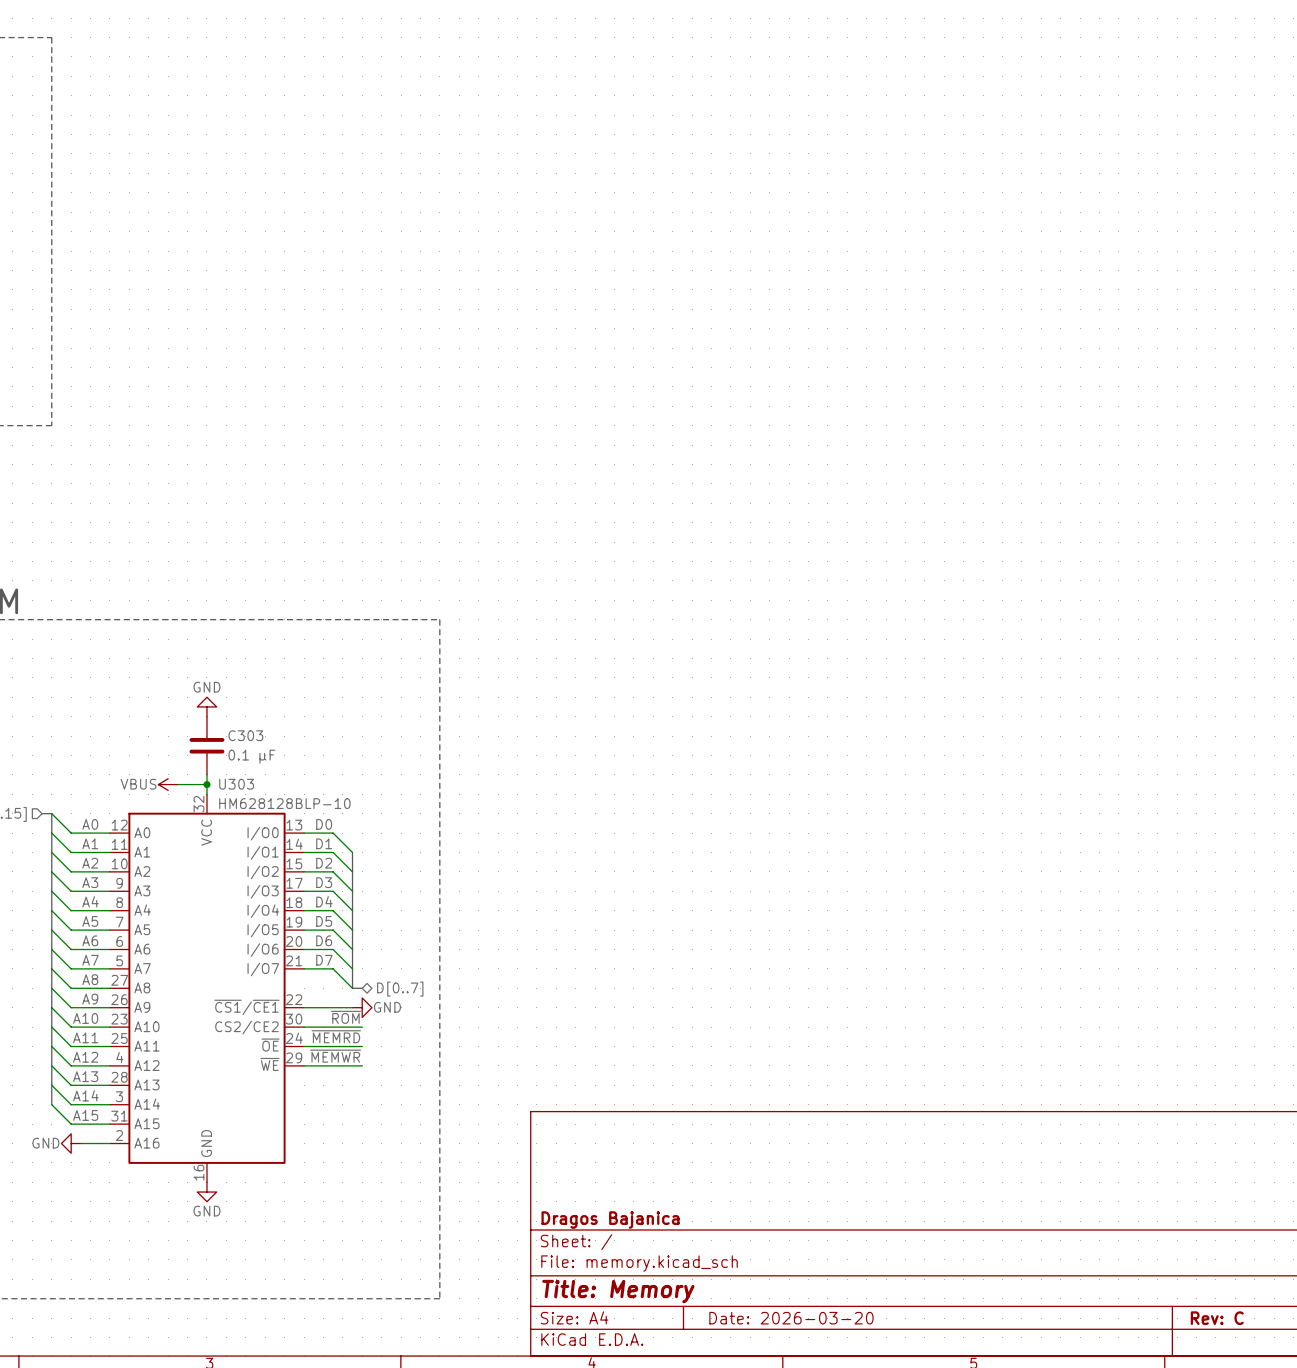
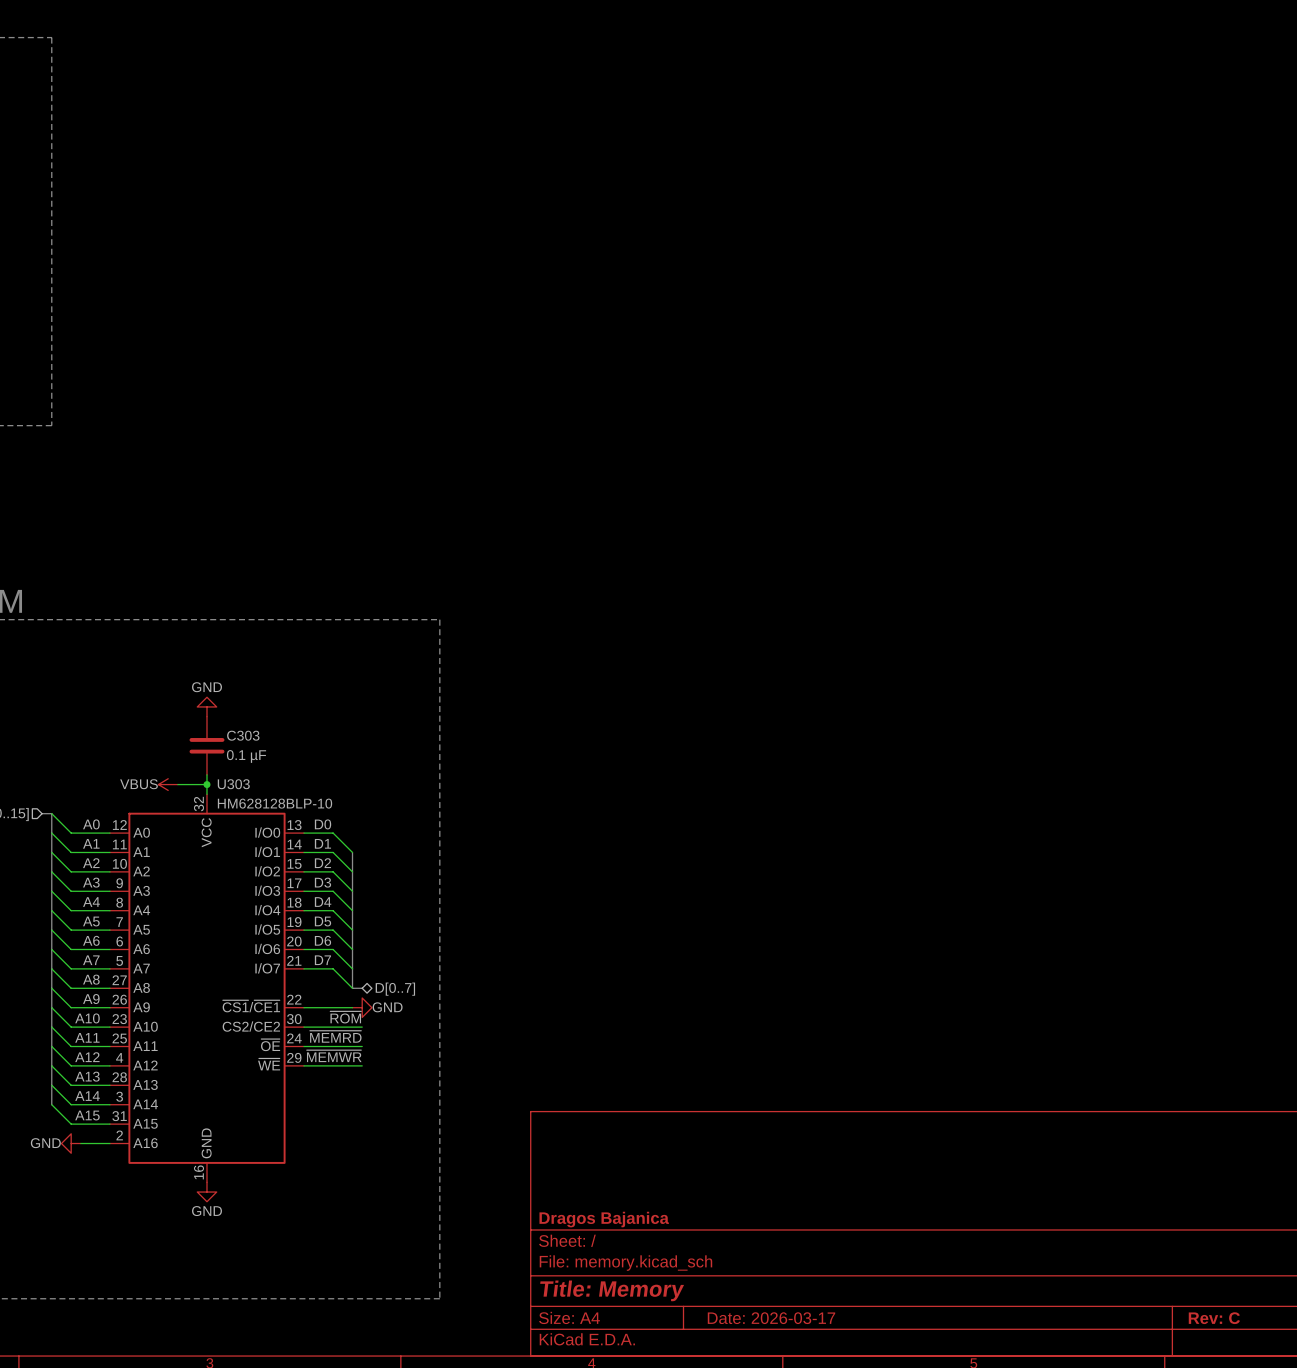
title block: Date: 2026-03-20 (791, 1318) -> Date: 2026-03-17 (771, 1318)

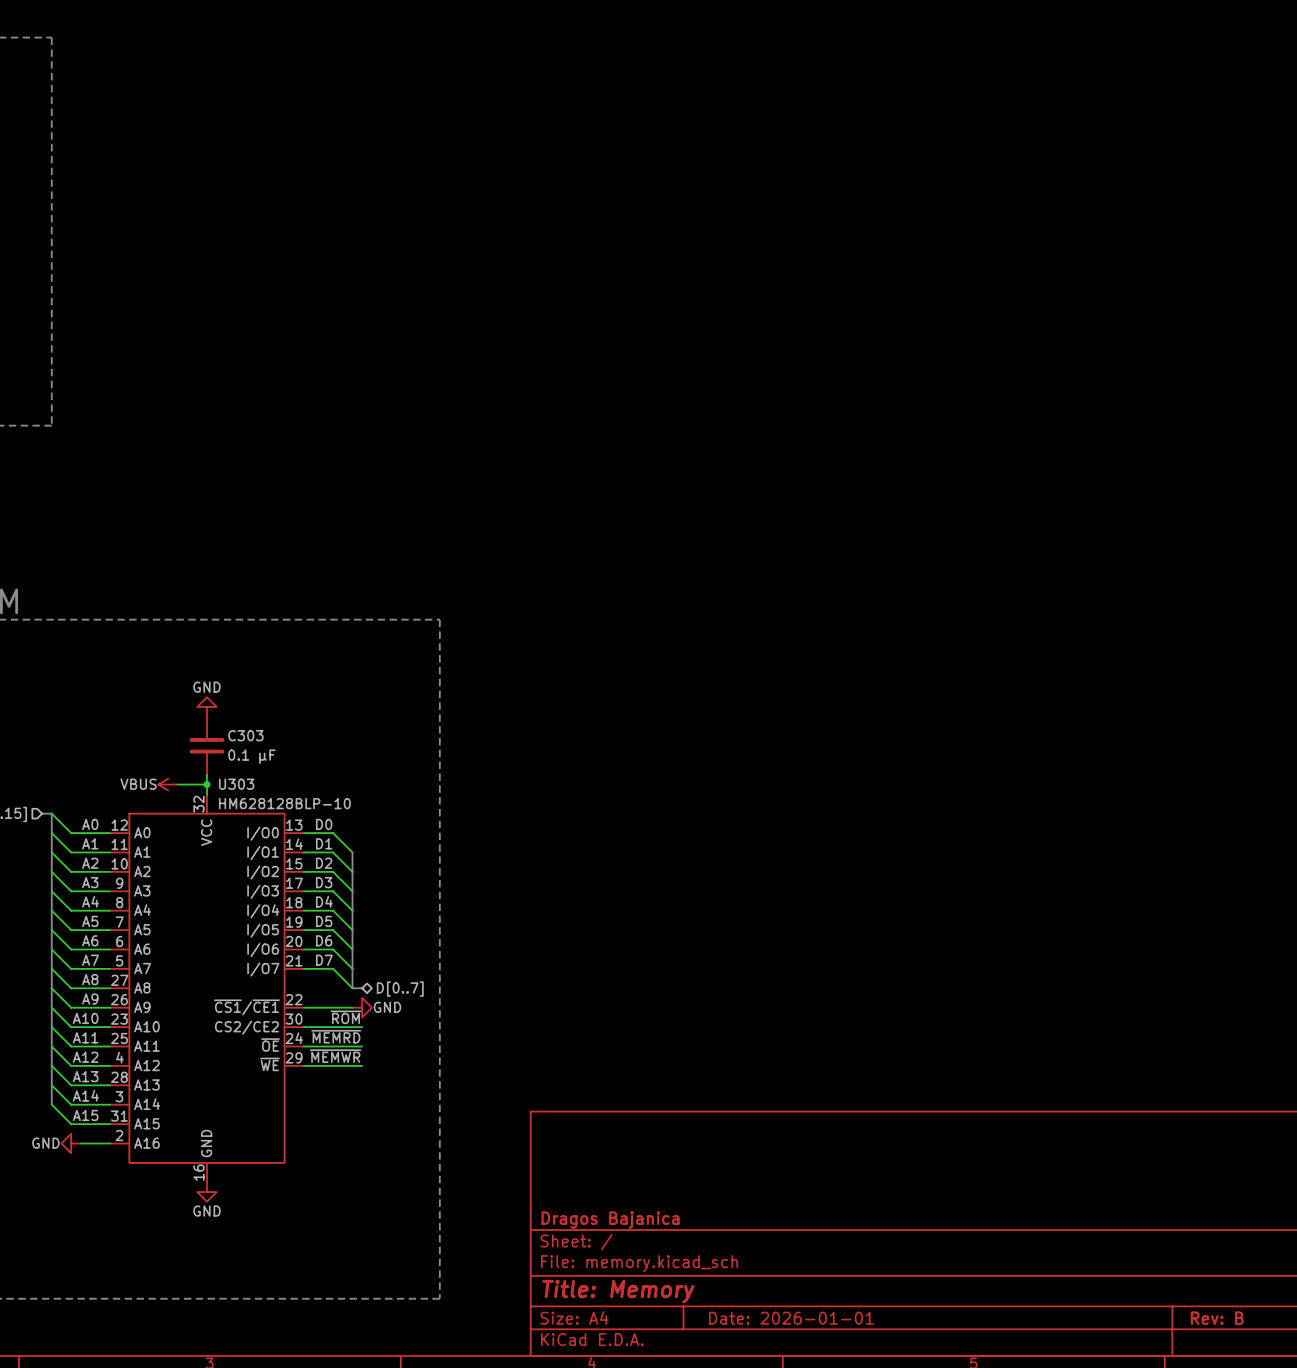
title block: Date: 2026-03-17 (771, 1318) -> Date: 2026-01-01 (791, 1318)
title block: Rev: C (1214, 1318) -> Rev: B (1217, 1318)

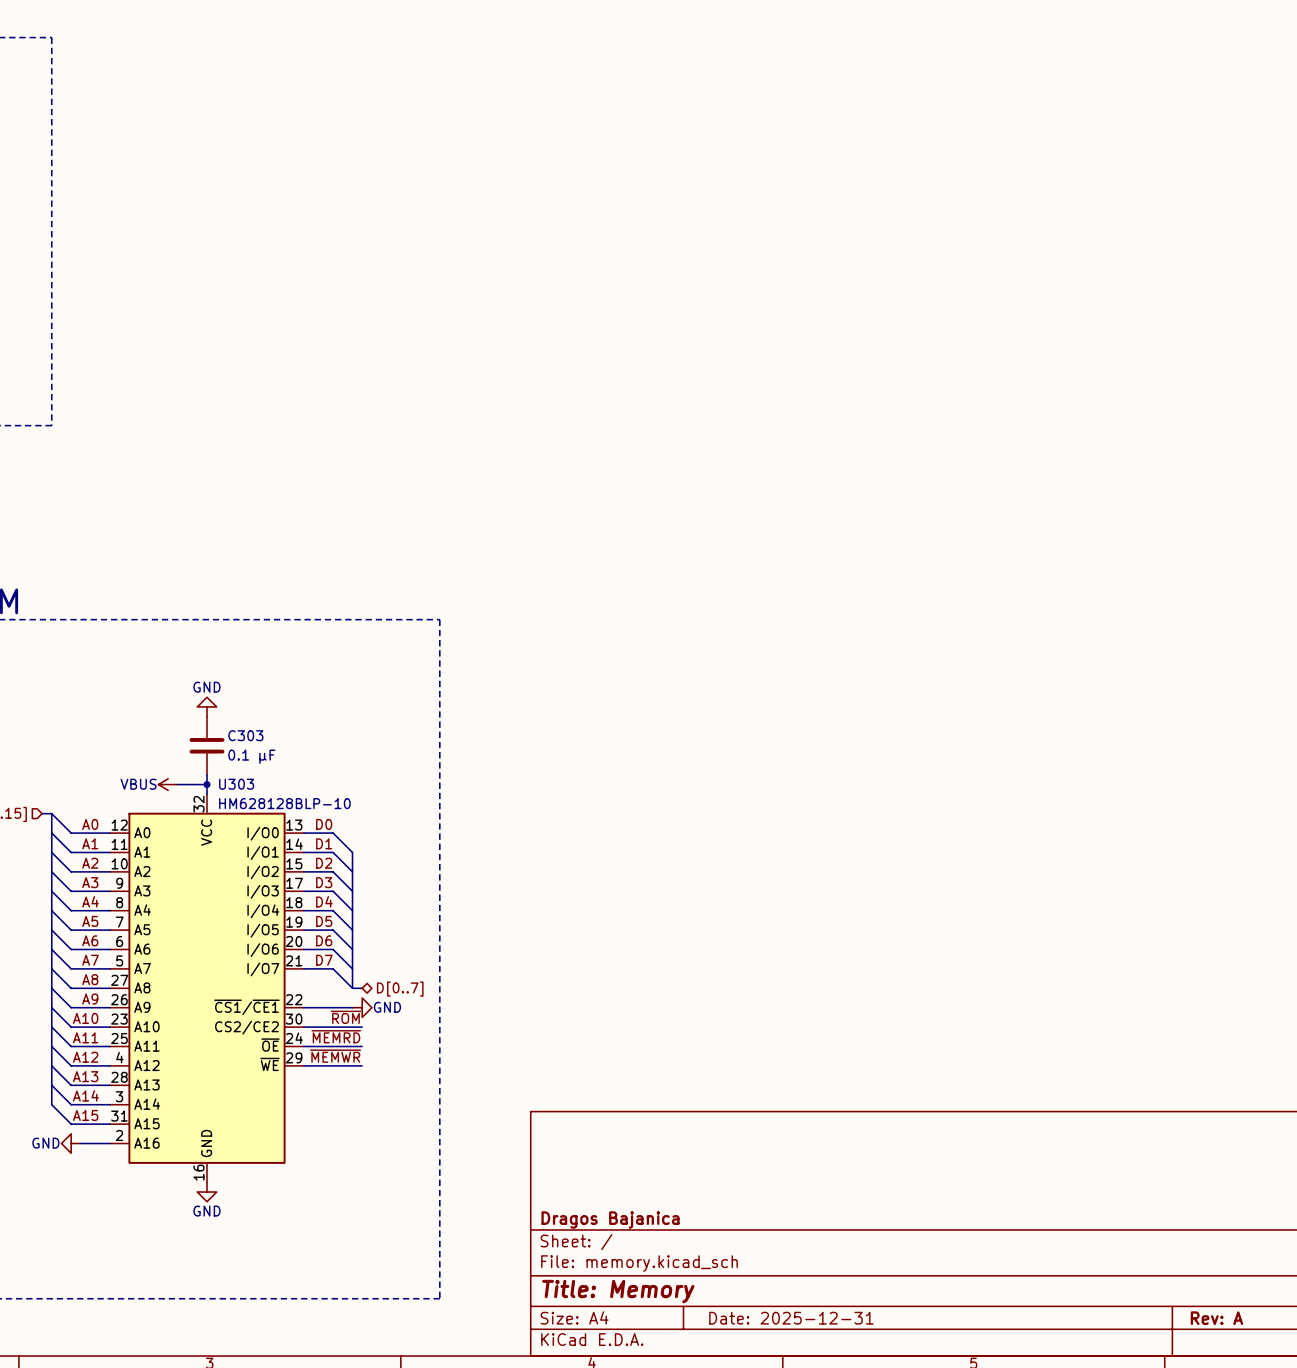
title block: Date: 2026-01-01 (791, 1318) -> Date: 2025-12-31 (791, 1318)
title block: Rev: B (1217, 1318) -> Rev: A (1216, 1318)

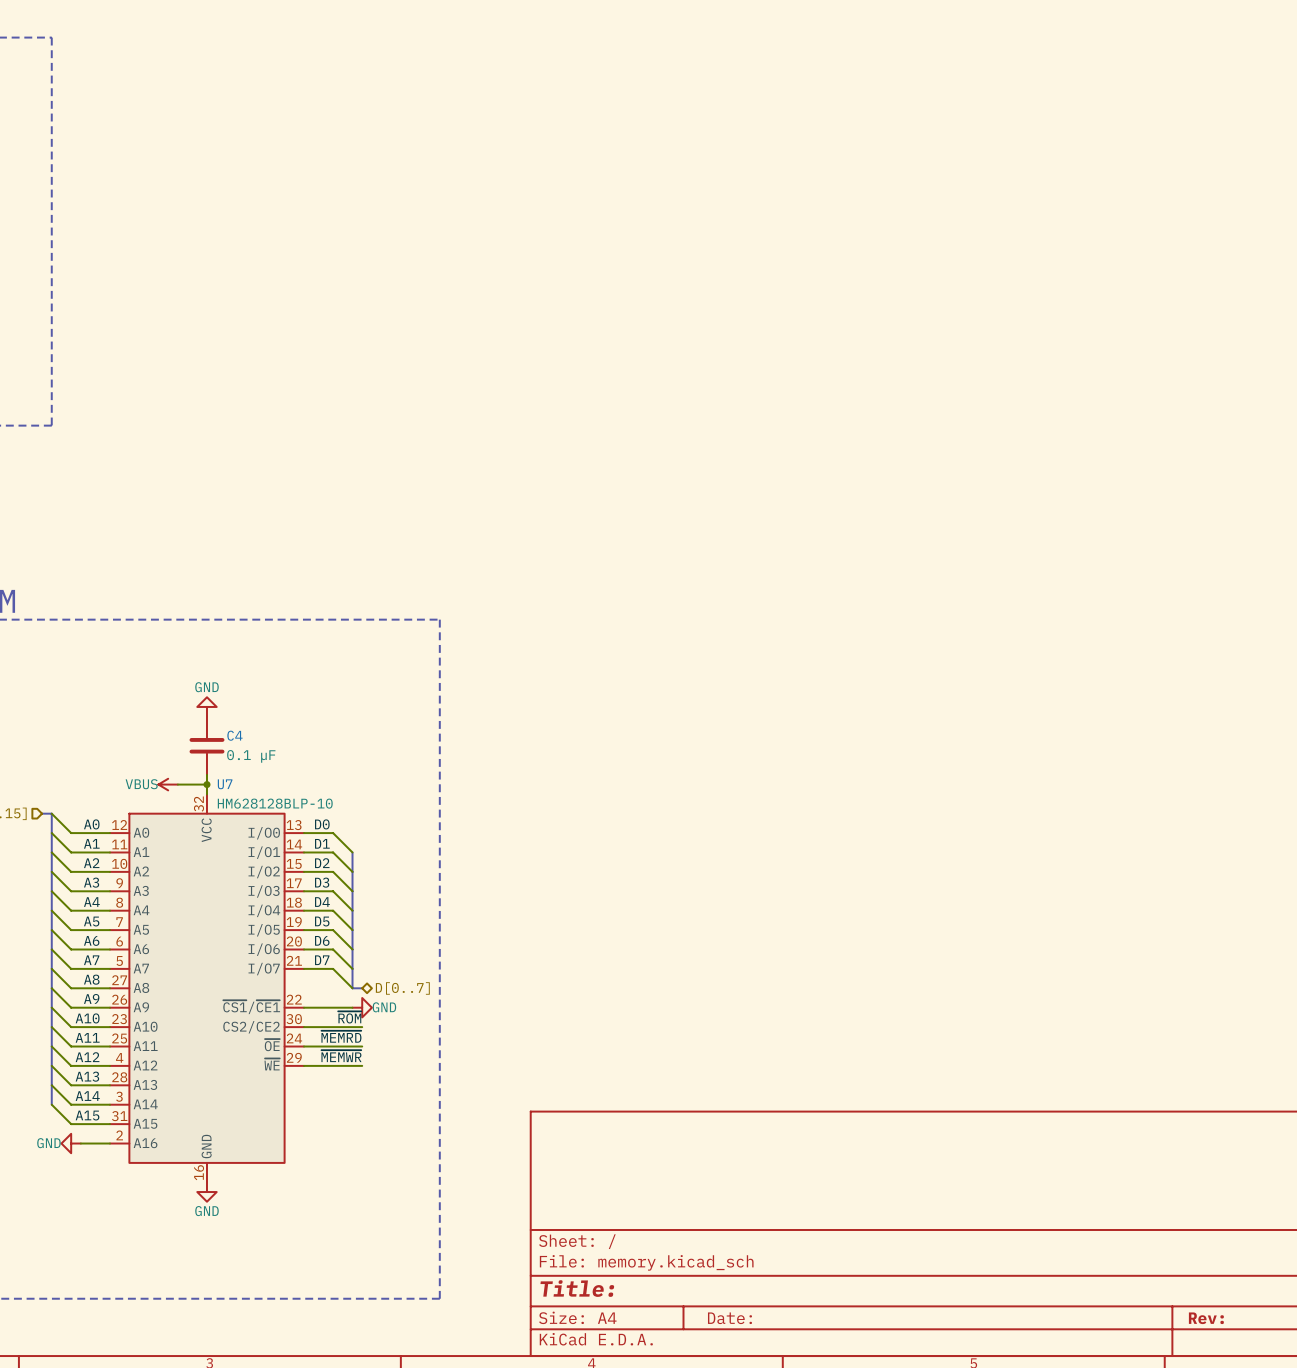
C303 name: C303 (245, 735) -> C4 (234, 735)
U303 name: U303 (236, 784) -> U7 (225, 784)
title block: Dragos Bajanica (610, 1220) -> none
title block: Title: Memory (618, 1291) -> Title: (577, 1288)
title block: Date: 2025-12-31 (791, 1318) -> Date: (729, 1318)
title block: Rev: A (1216, 1318) -> Rev: (1206, 1318)

